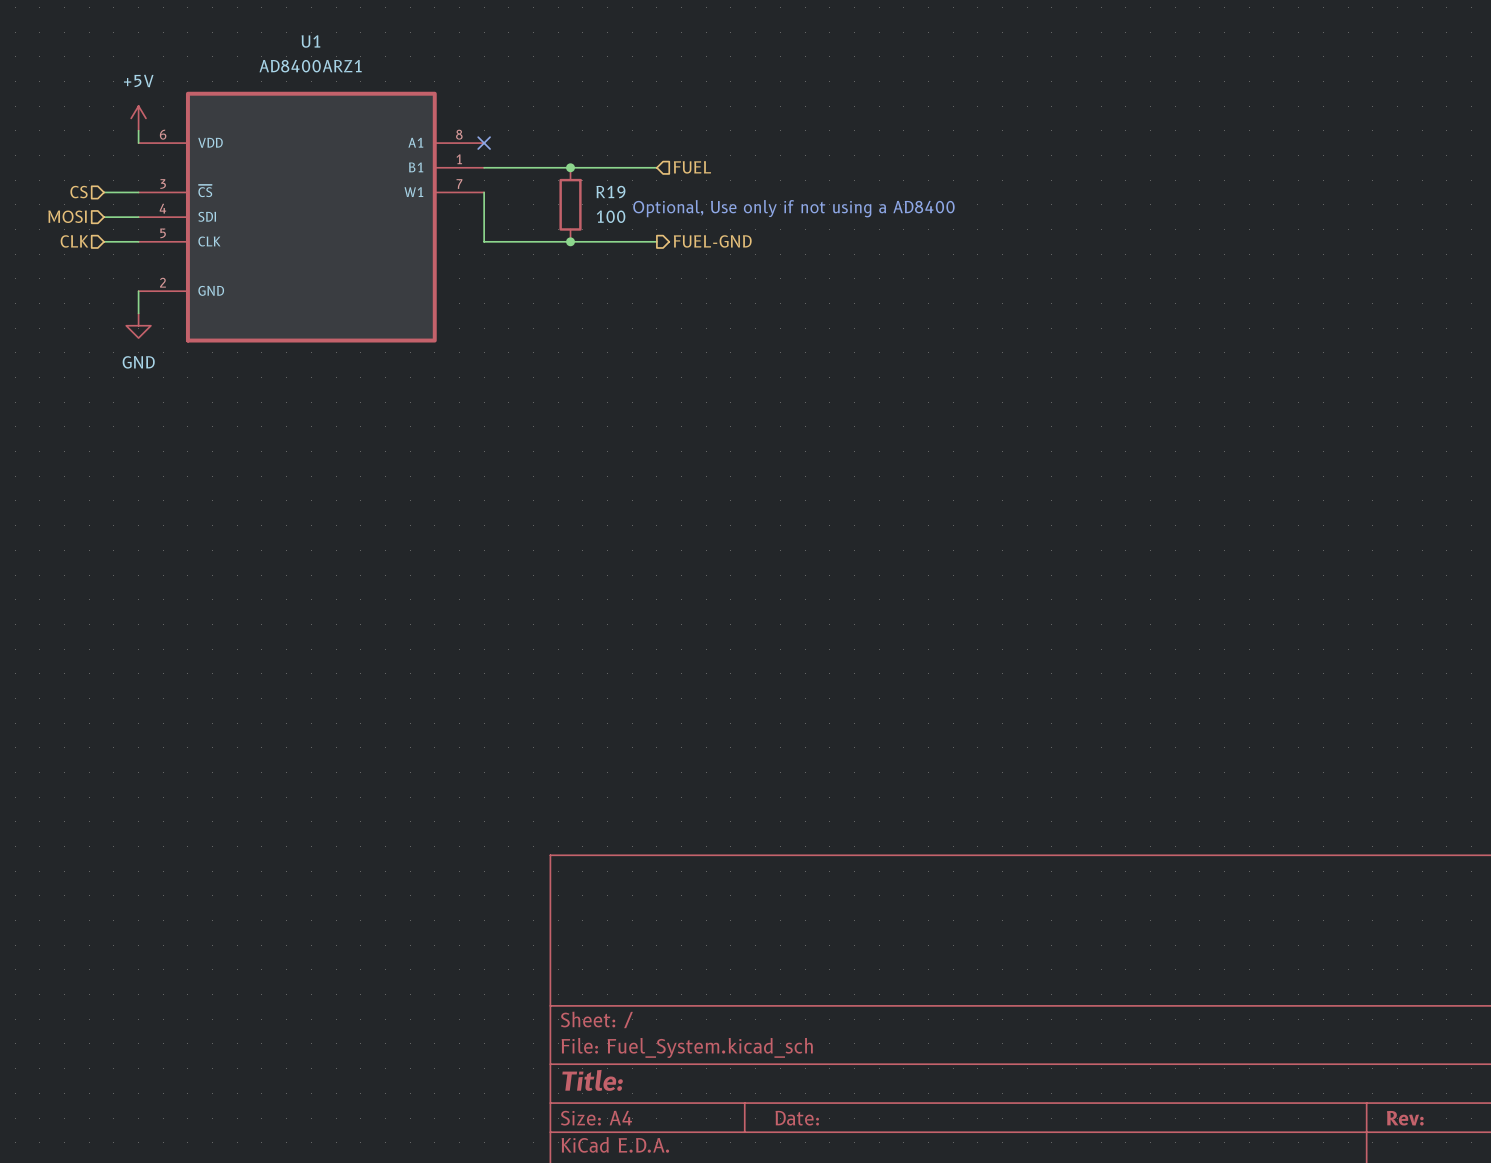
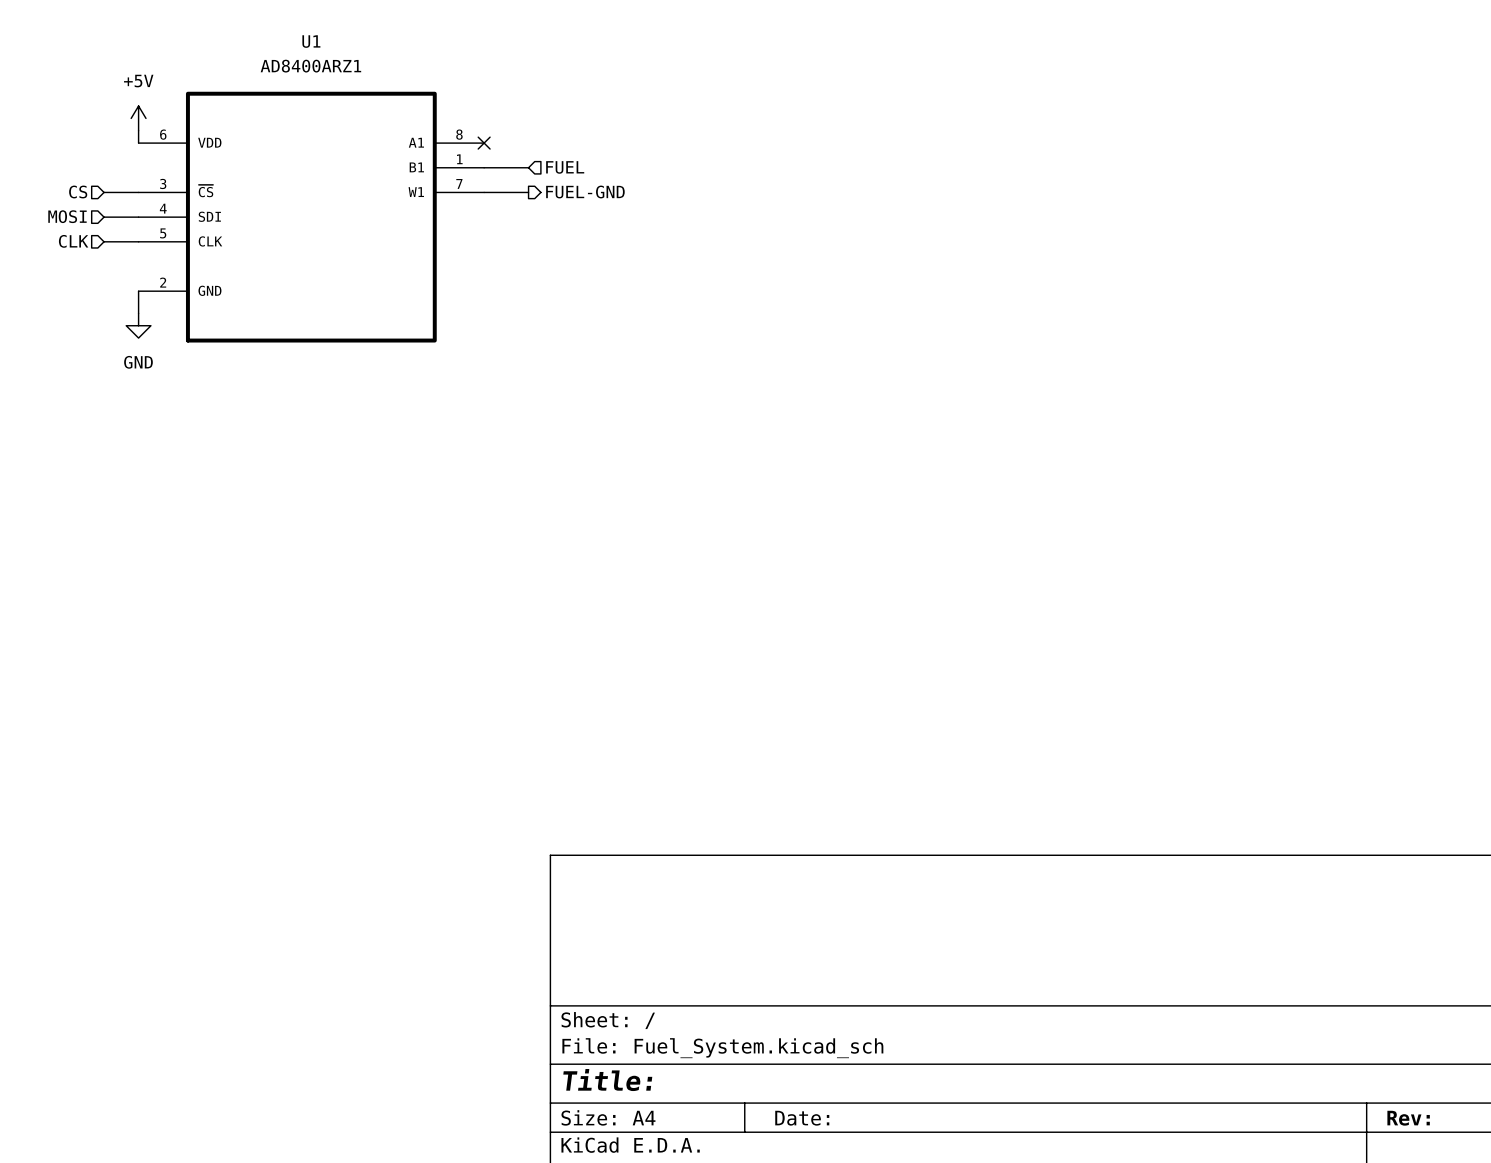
wire: (528, 167) (656, 167) -> none
junction: (570, 167) -> none
hierarchical label position: FUEL (692, 167) -> FUEL (565, 167)
wire: (484, 192) (484, 241) (656, 241) -> (484, 192) (528, 192)
R19: 100 (570, 204) -> none
text: Optional, Use only if not using a AD8400 (793, 208) -> none
junction: (570, 241) -> none
hierarchical label position: FUEL-GND (712, 241) -> FUEL-GND (585, 192)

